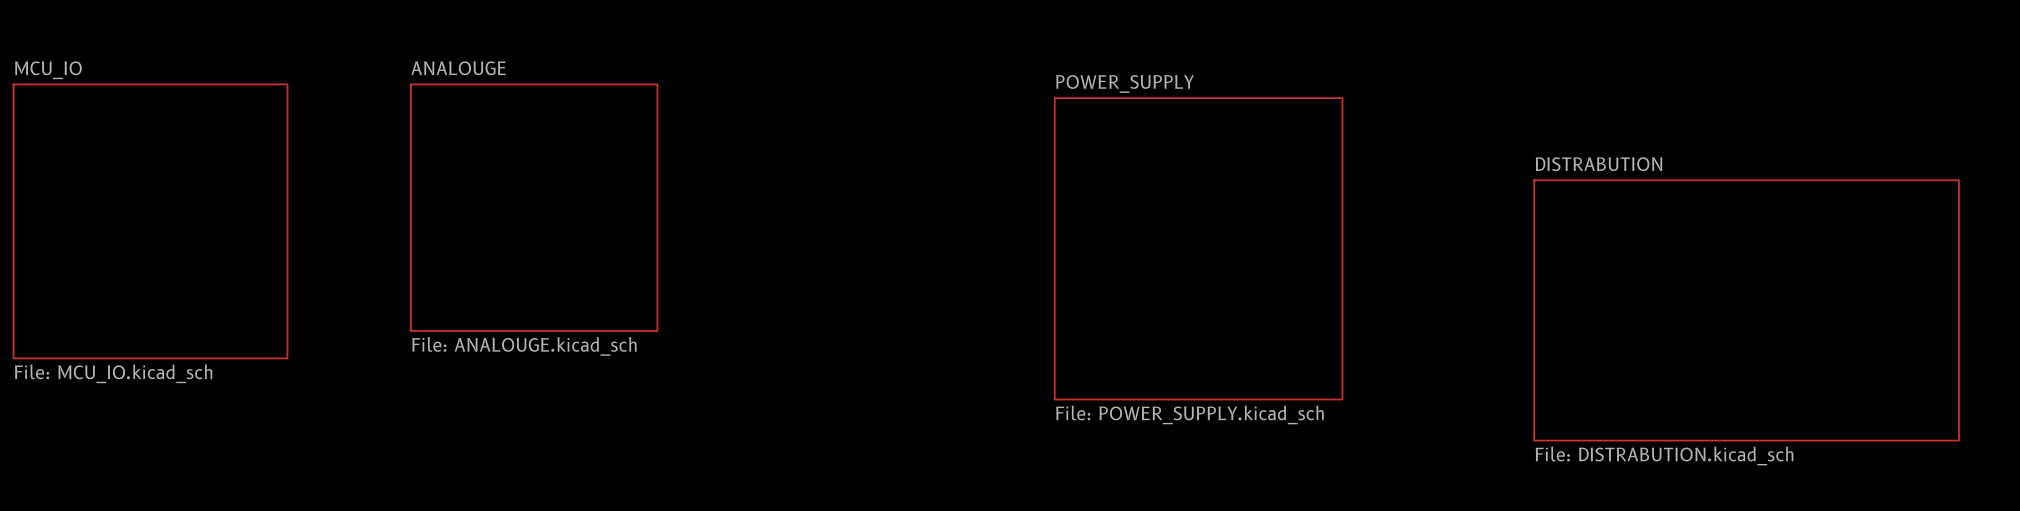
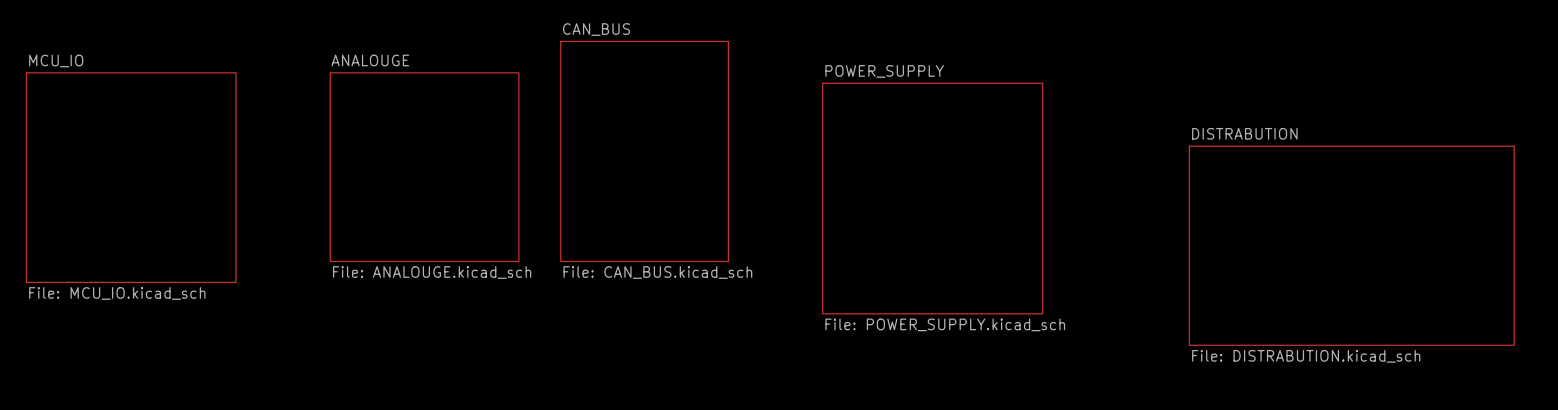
sheet CAN_BUS: none -> File: CAN_BUS.kicad_sch (644, 151)

